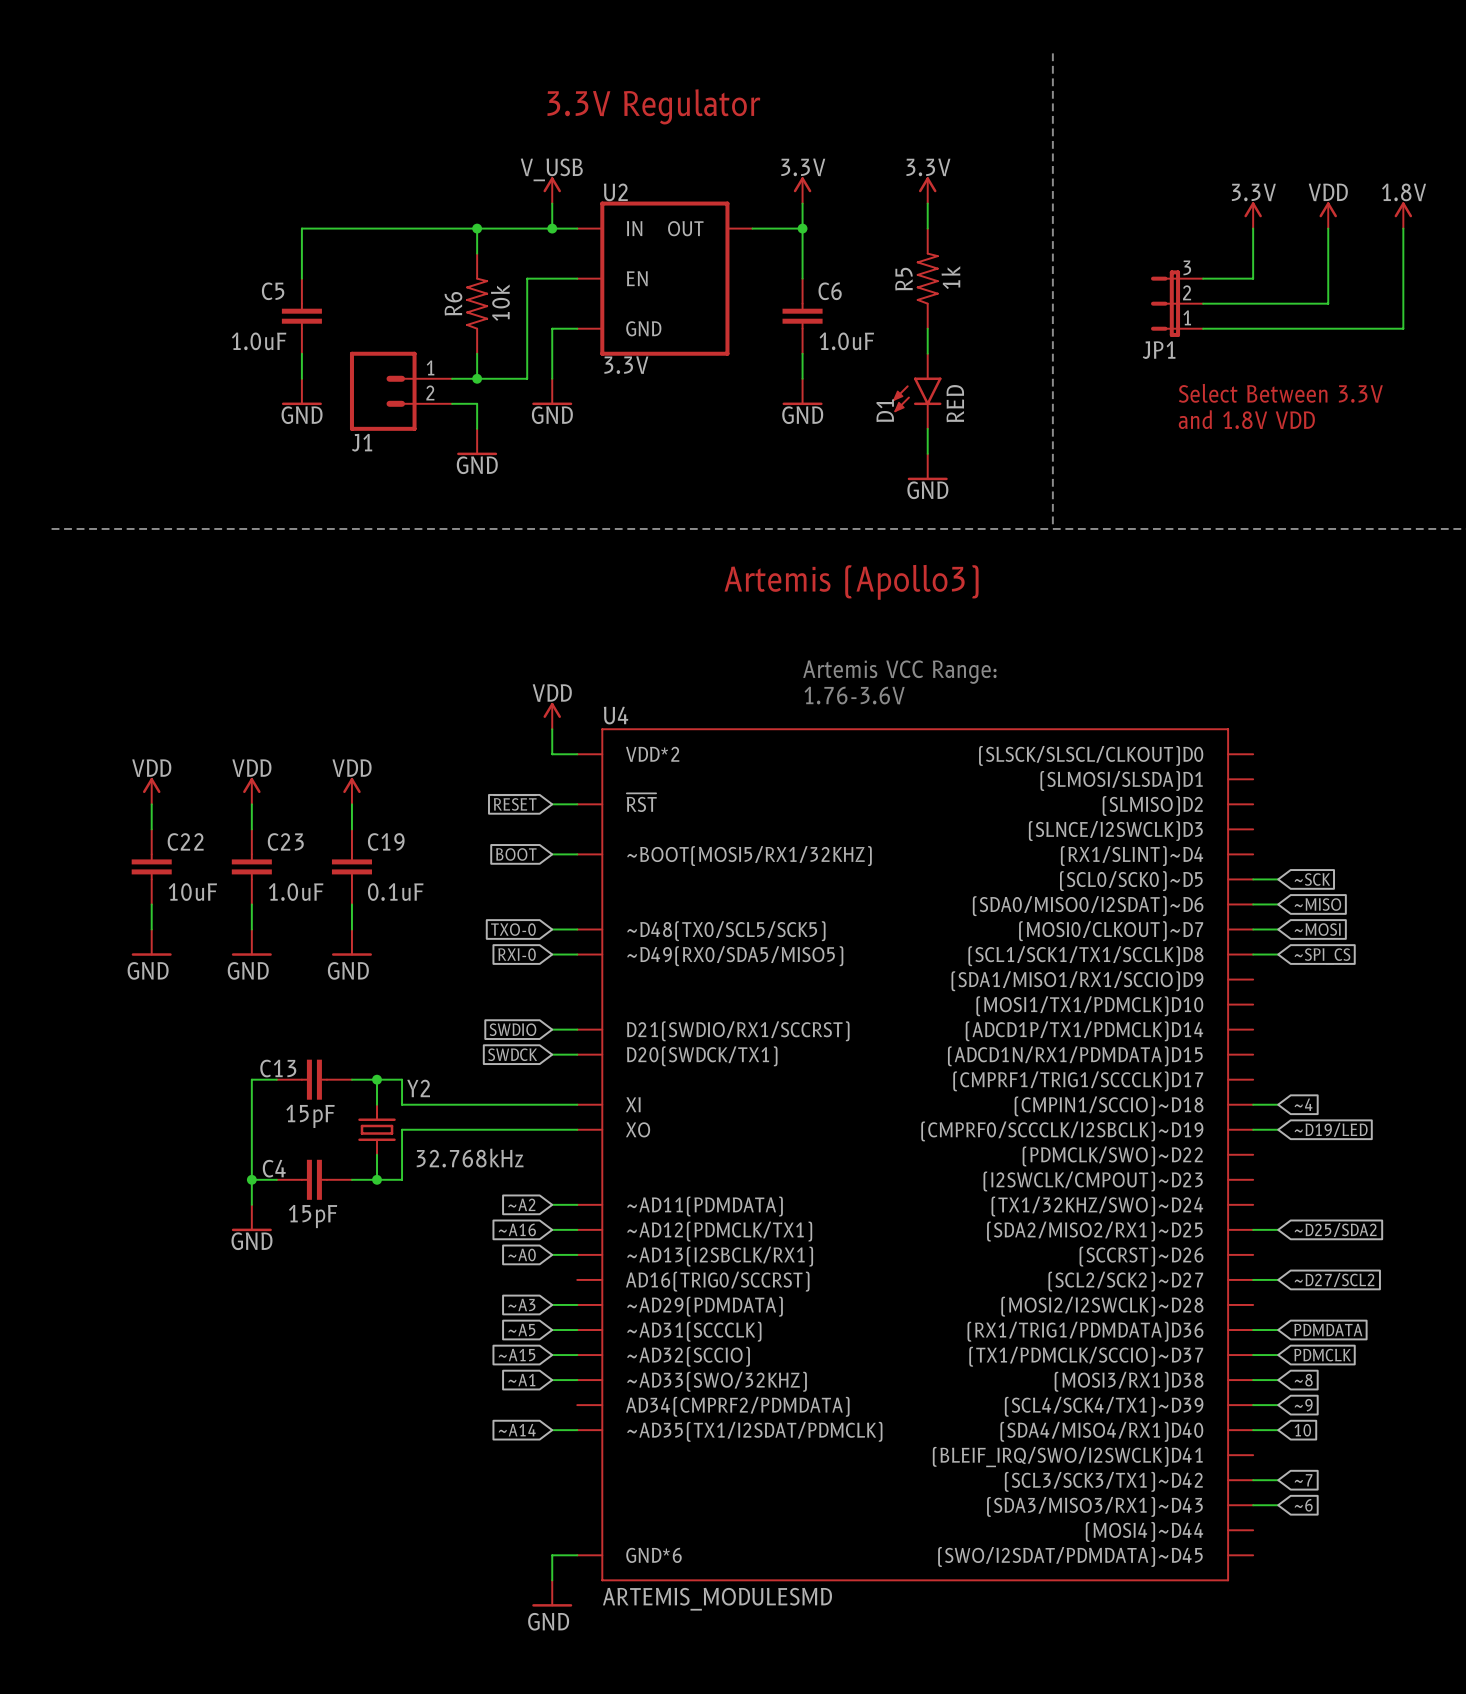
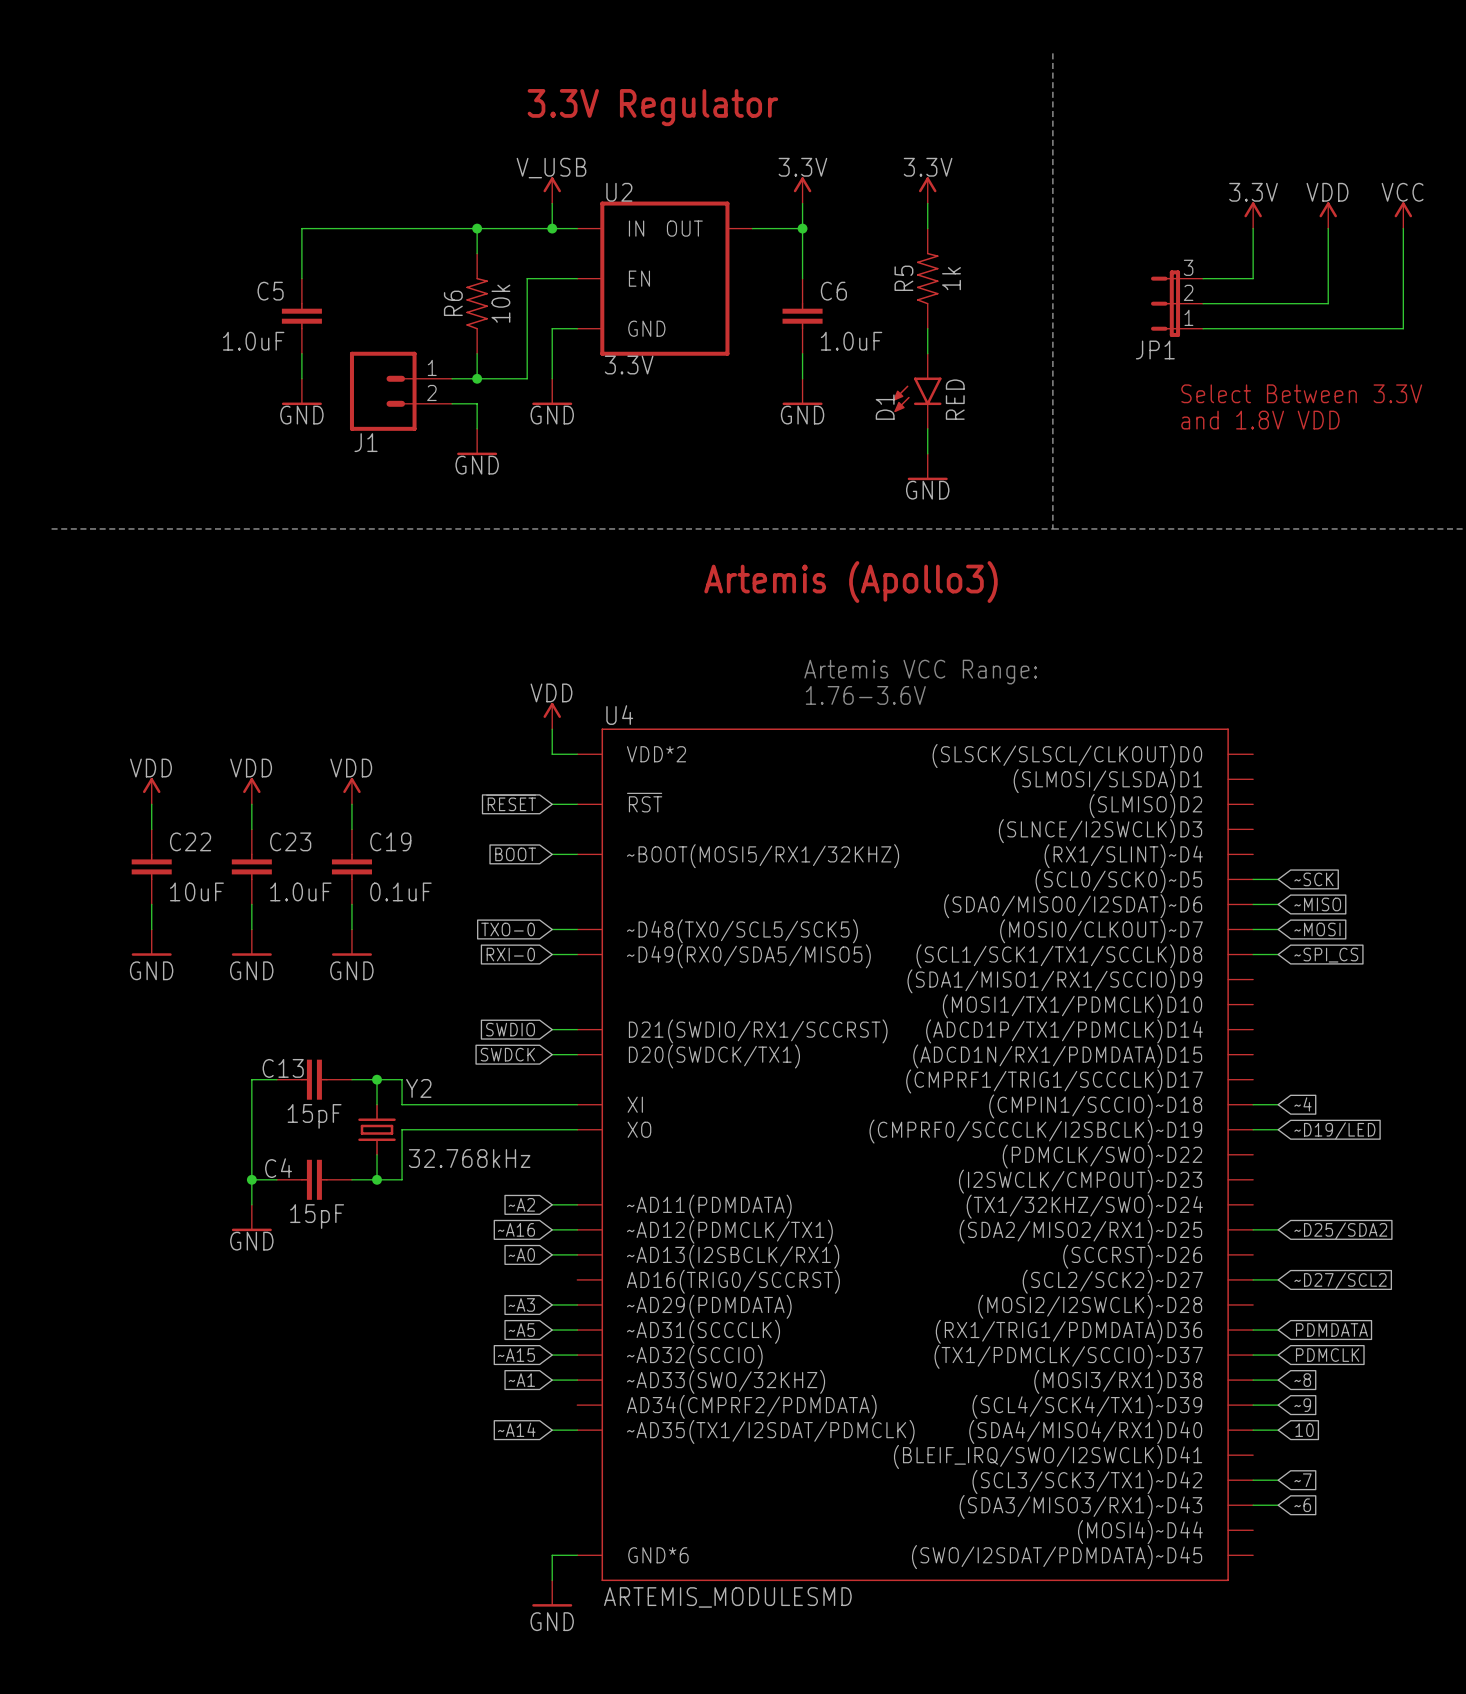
power symbol: 1.8V (1403, 215) -> VCC (1403, 215)

